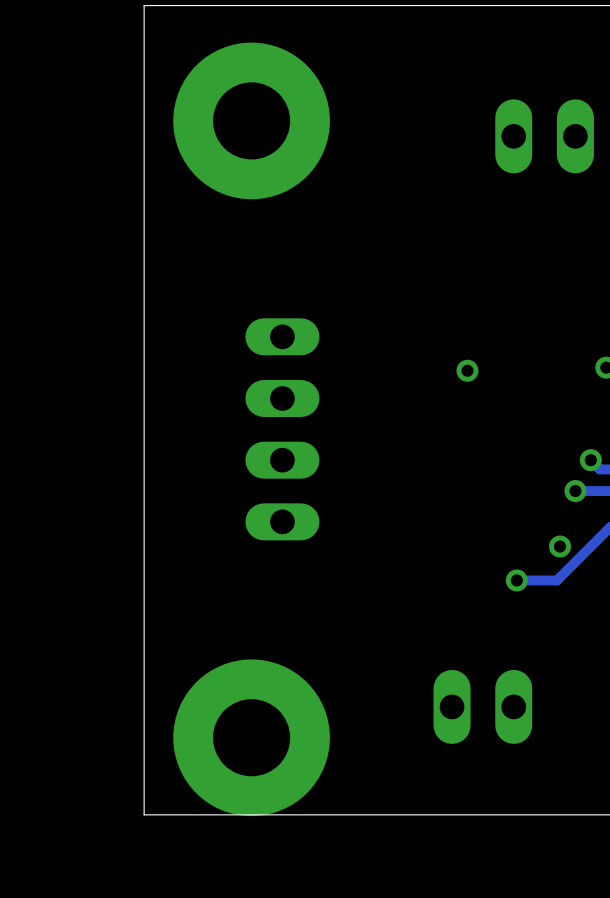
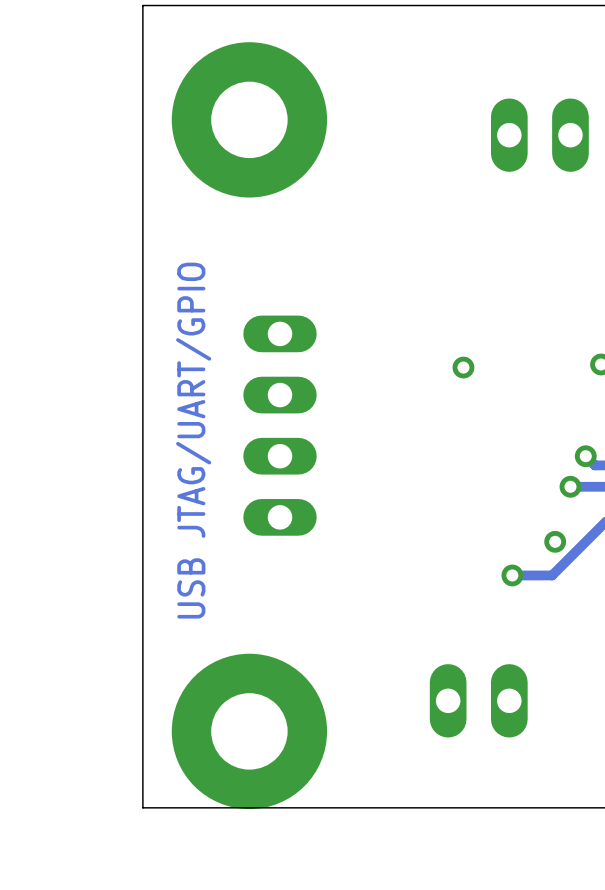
text: none -> USB JTAG/UART/GPIO (193, 440)

